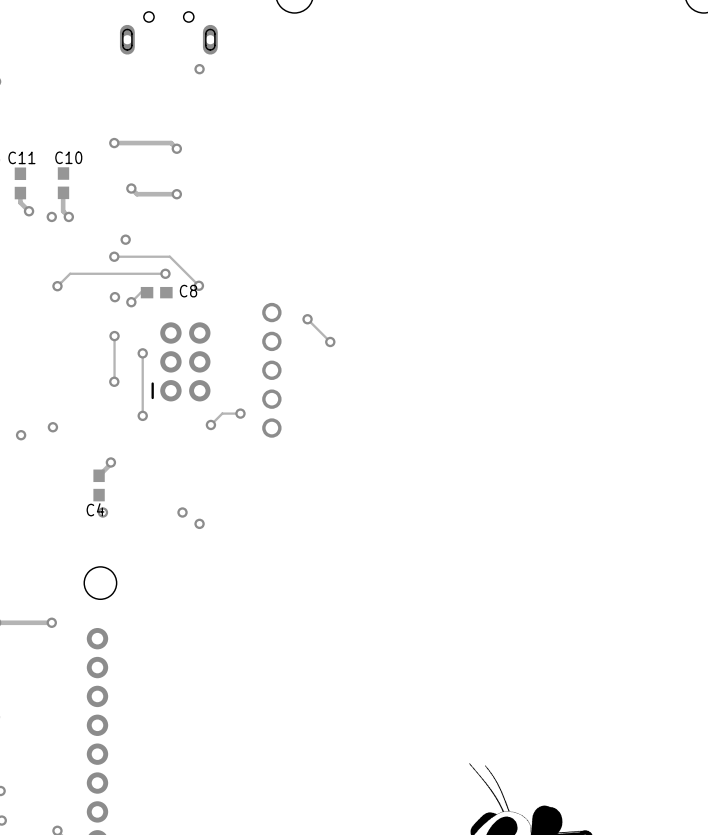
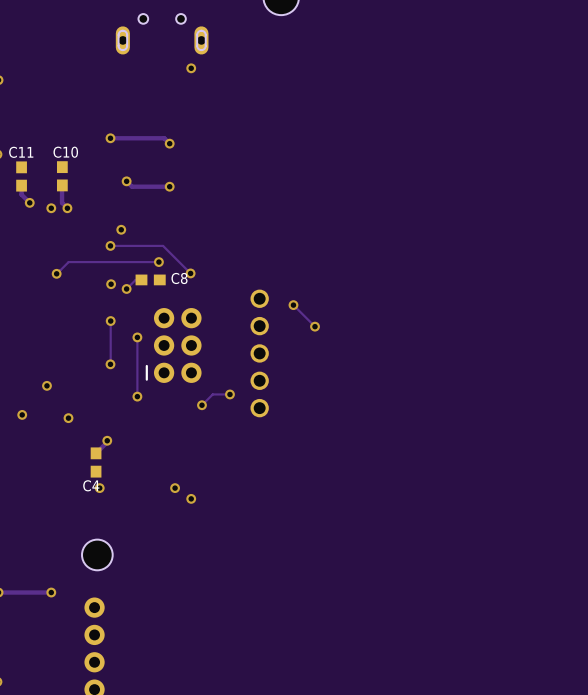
via: none -> (46, 385)
via: (52, 427) -> none
via: none -> (68, 418)

